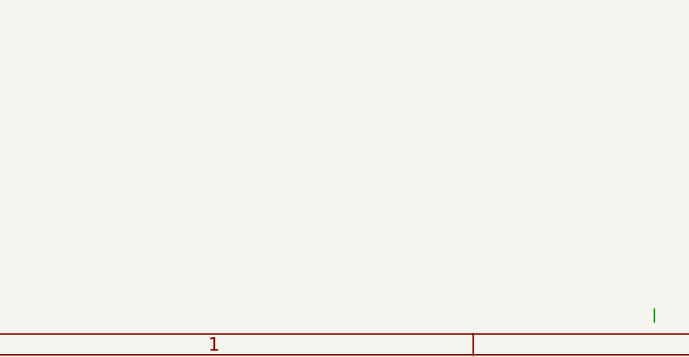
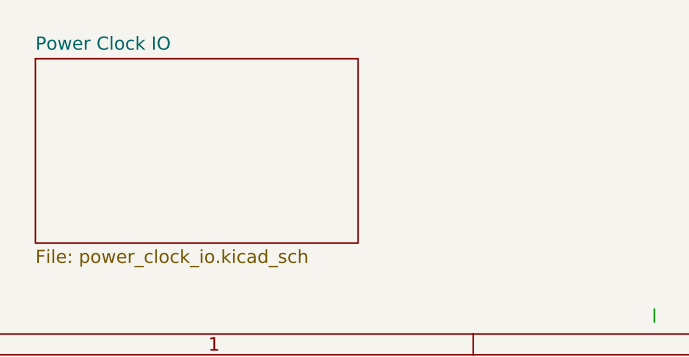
sheet Power Clock IO: none -> File: power_clock_io.kicad_sch (196, 150)

